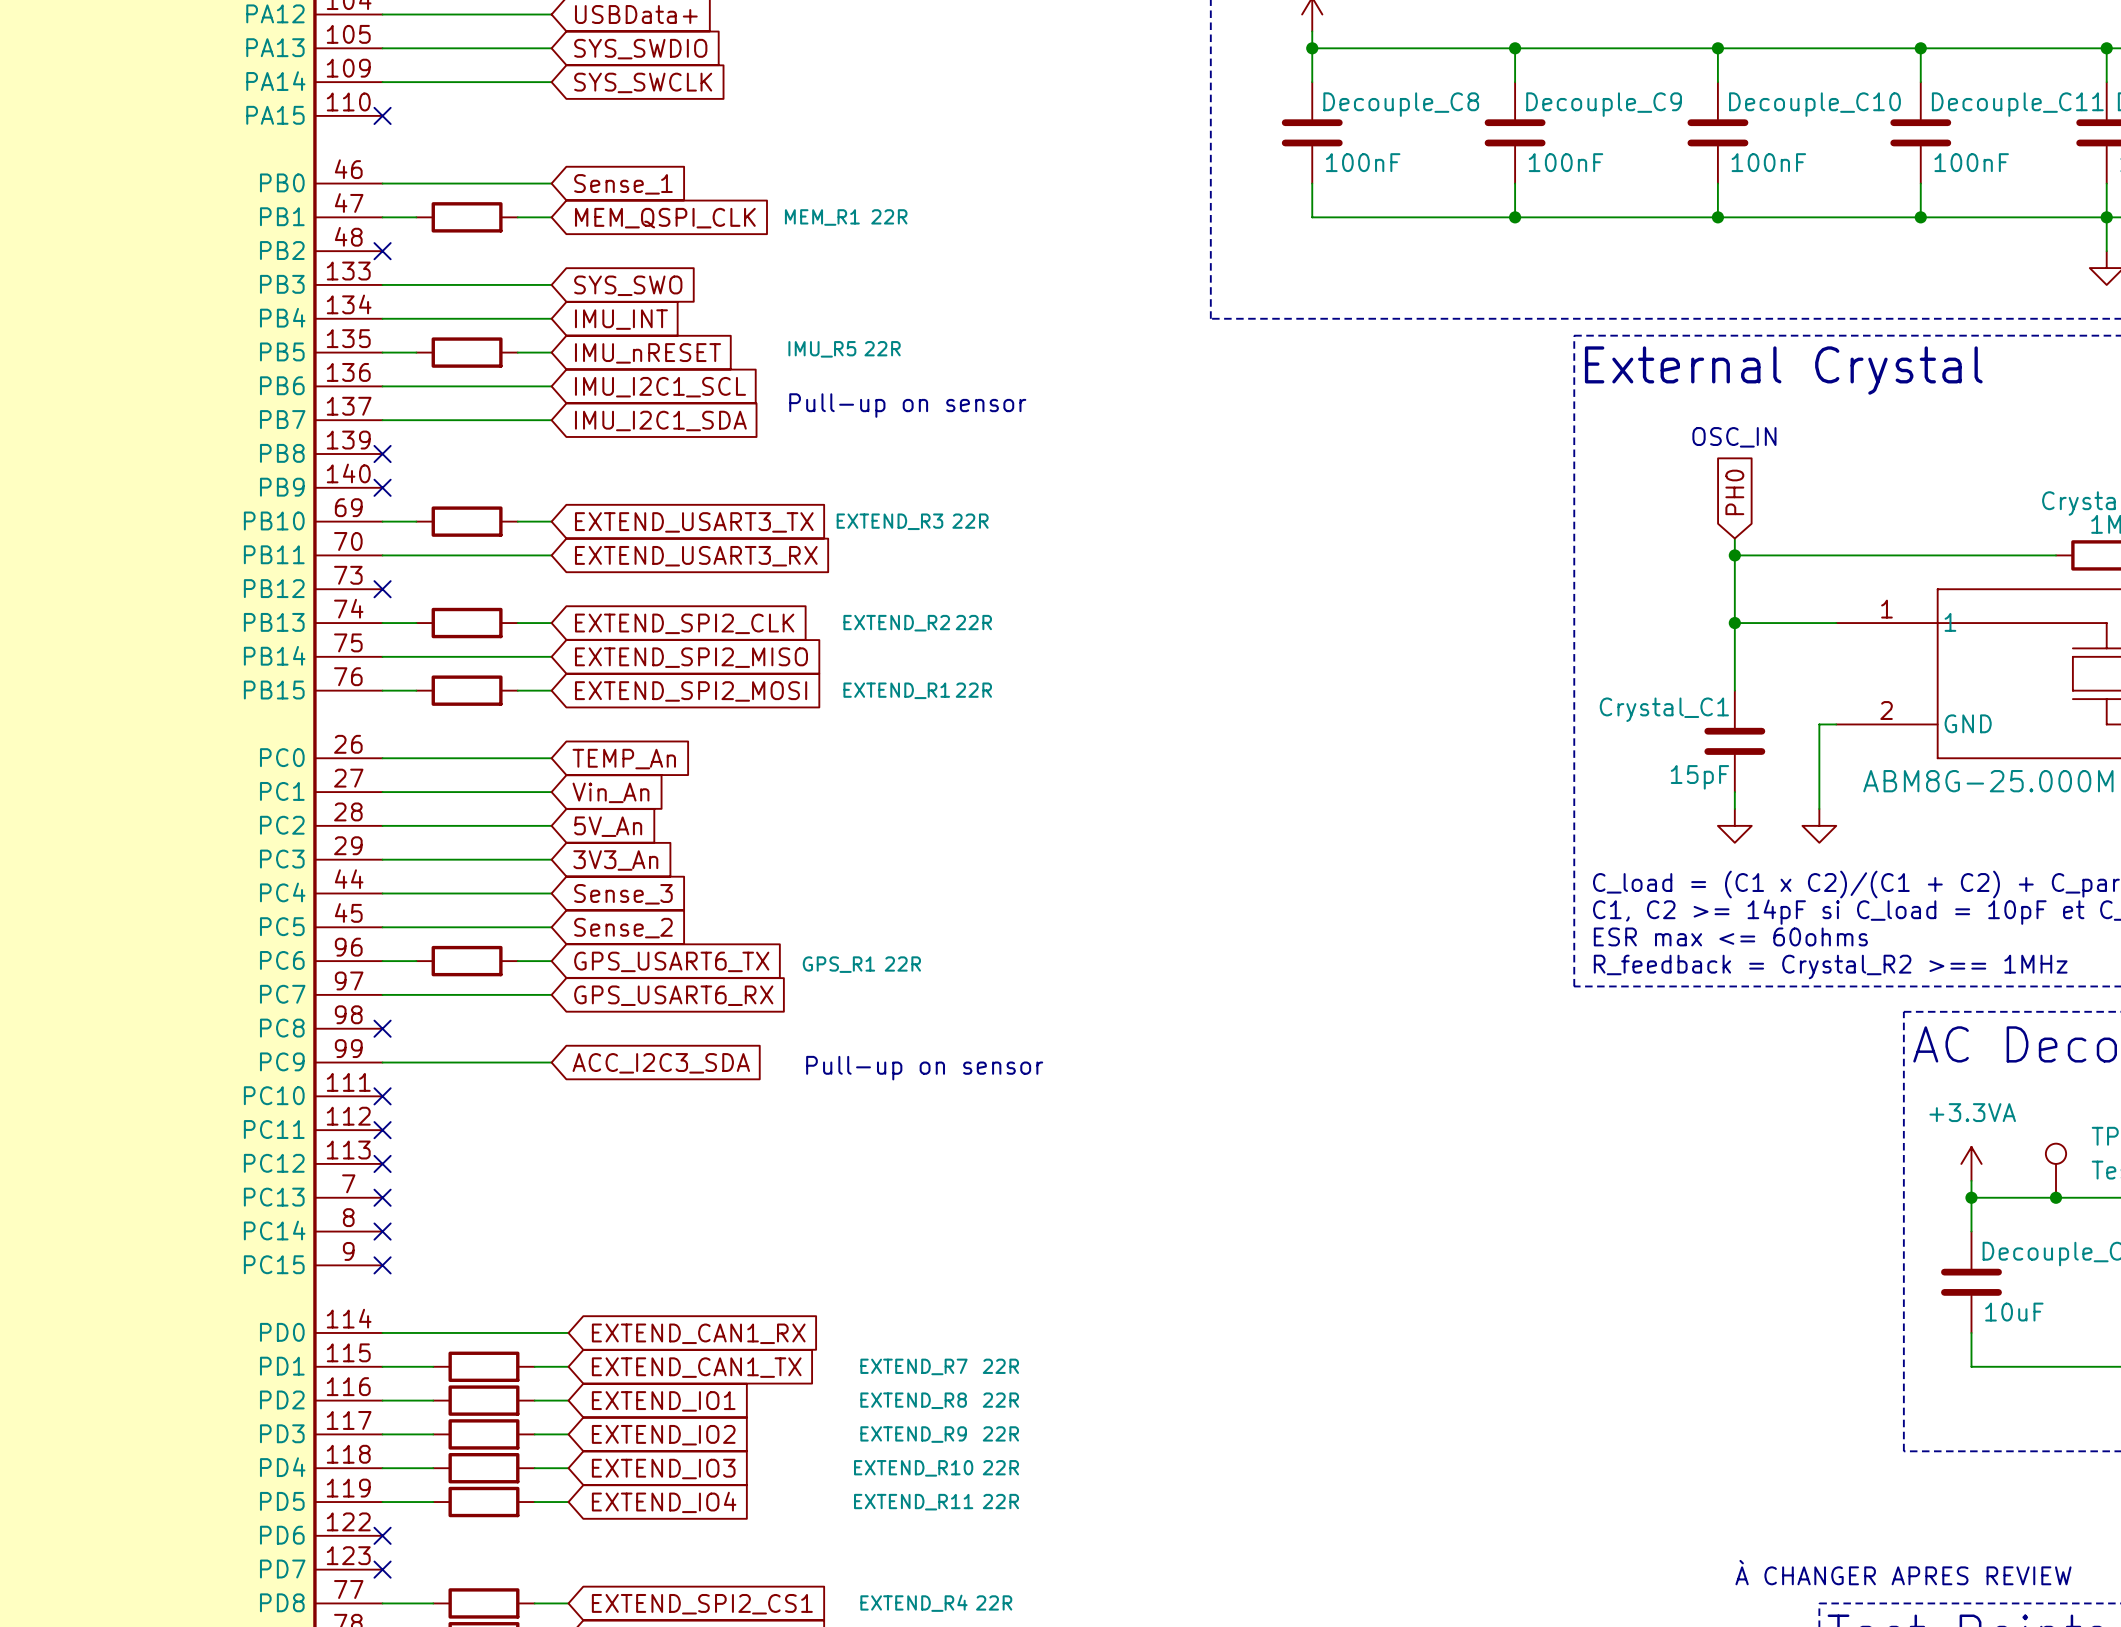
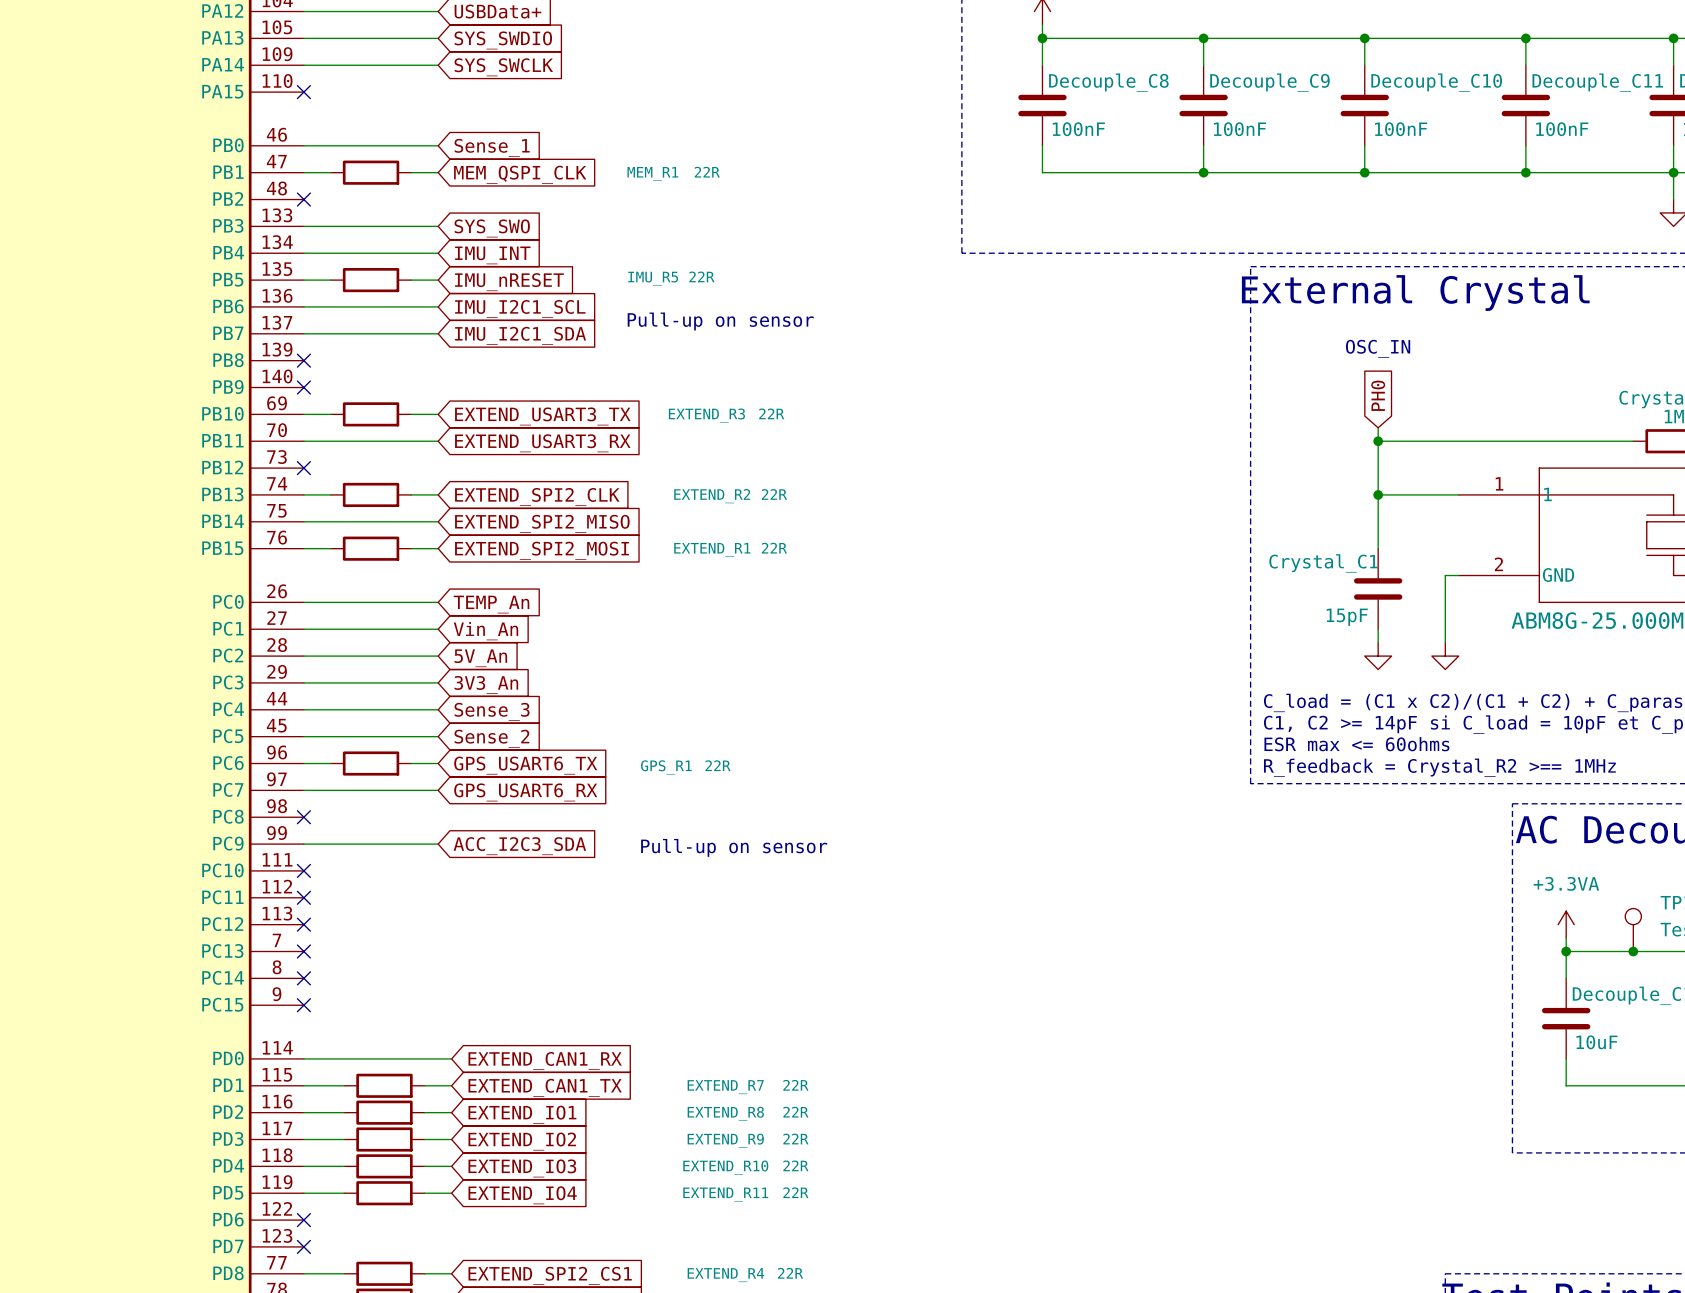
text: À CHANGER APRES REVIEW (1903, 1572) -> none

